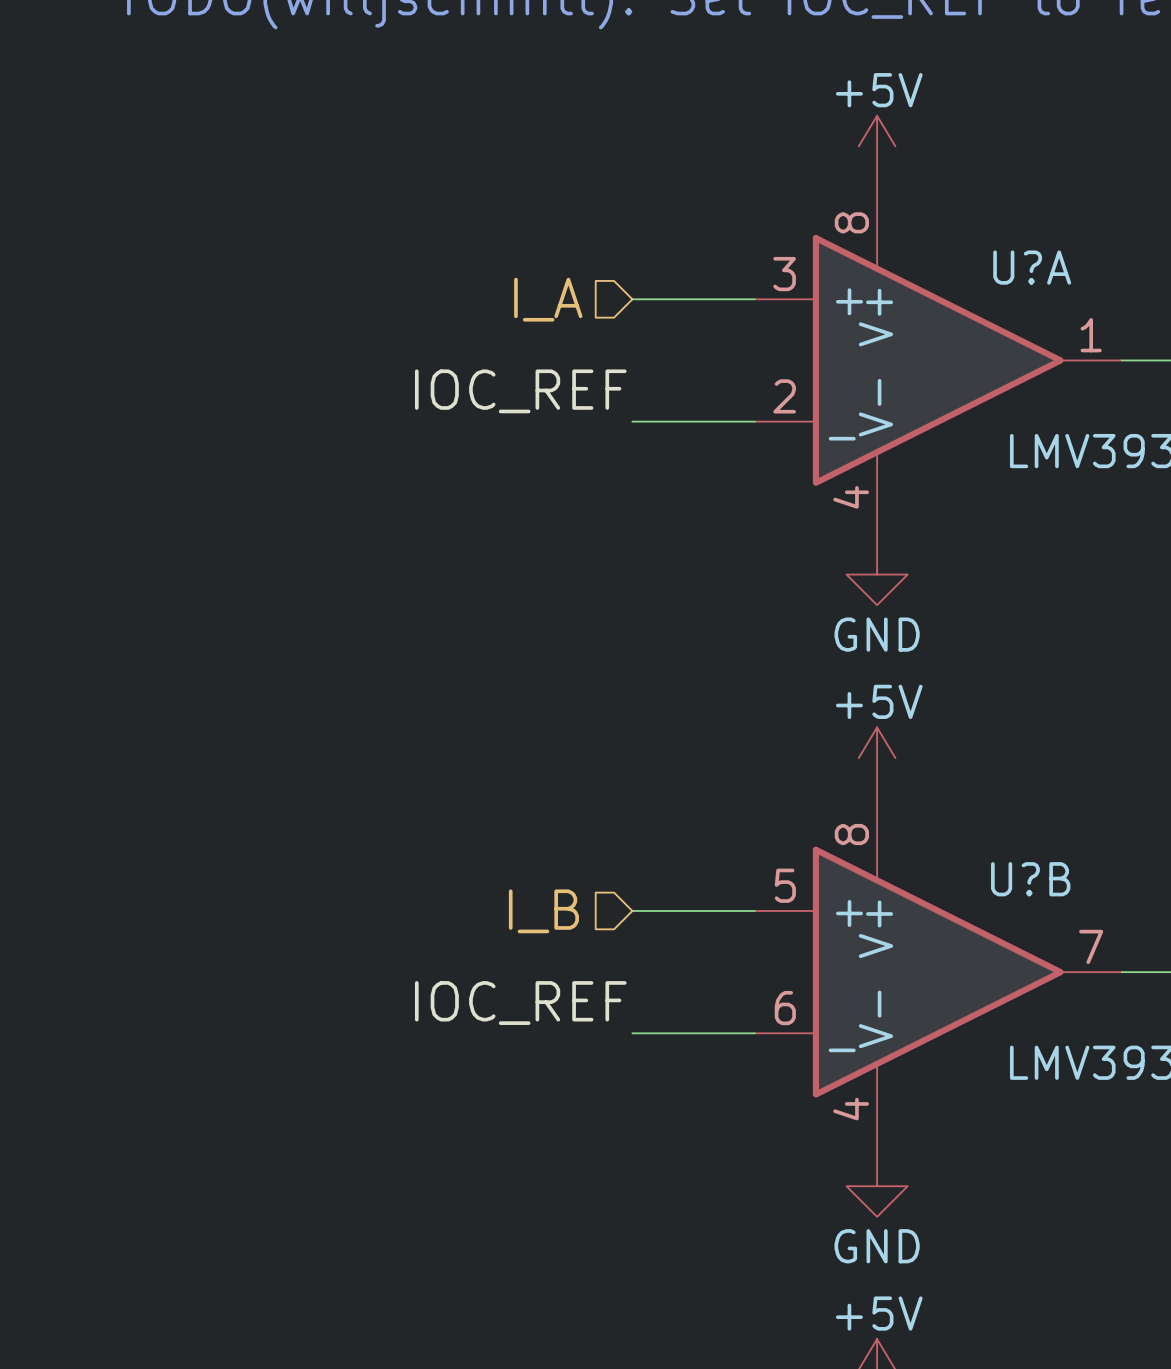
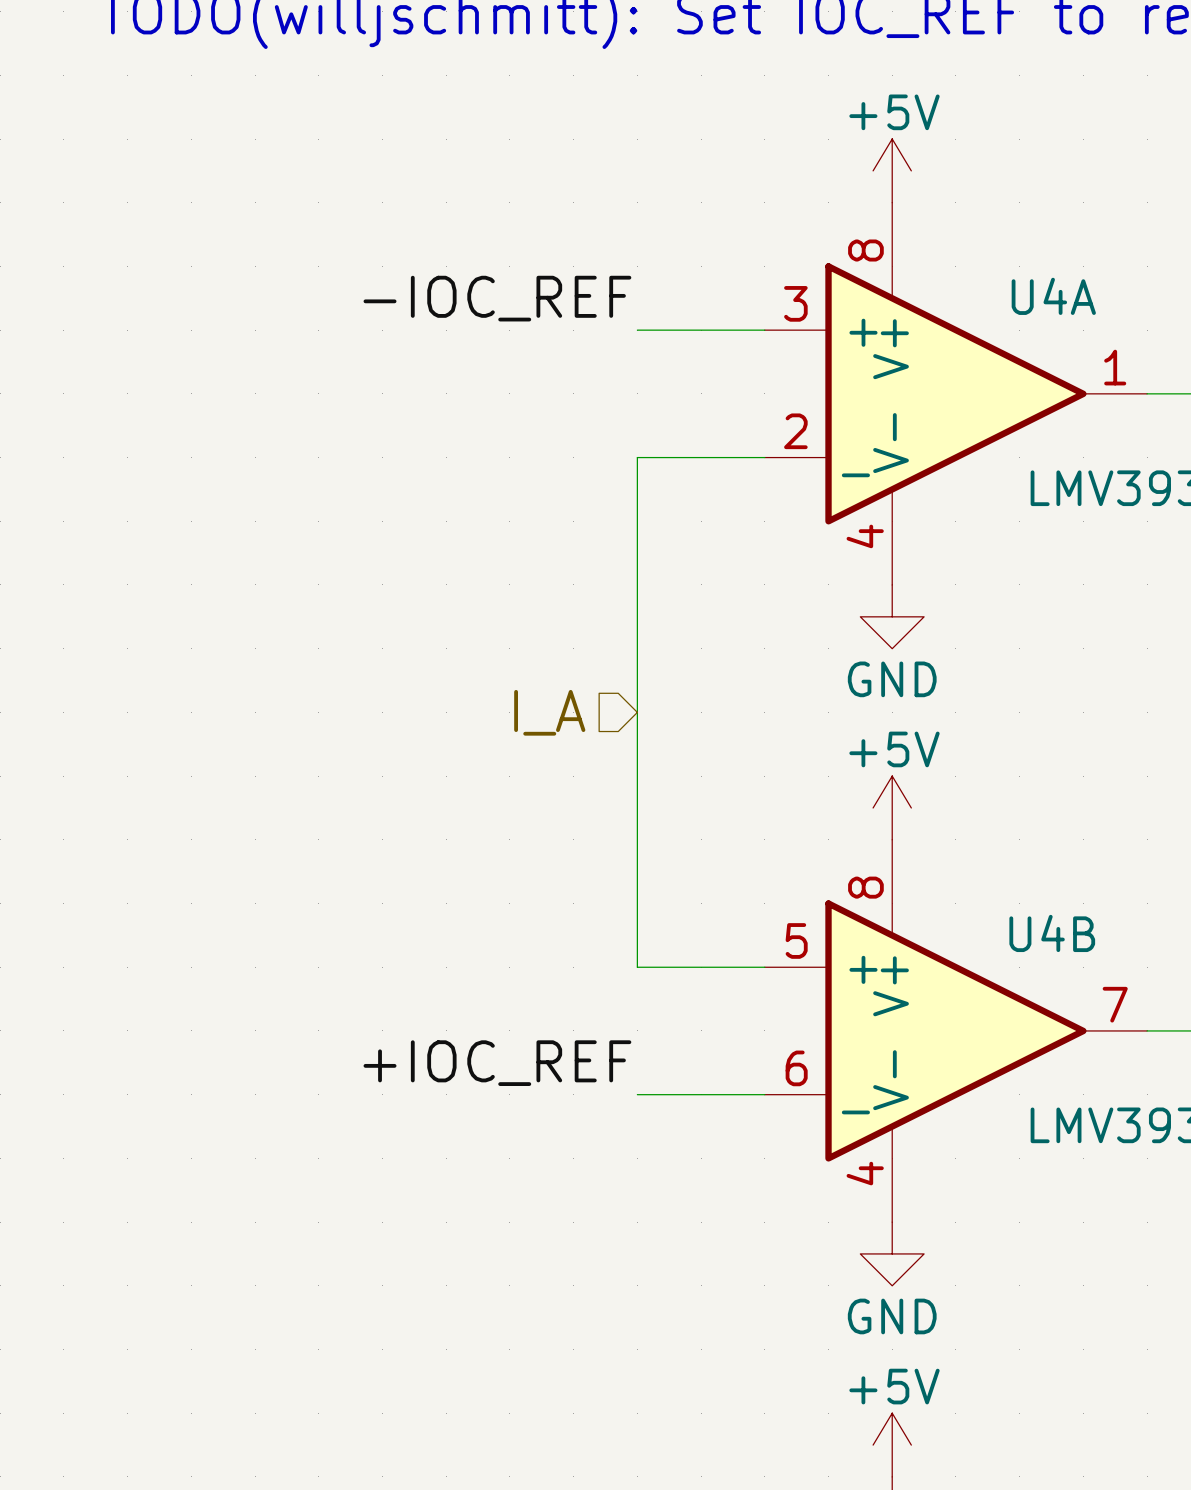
U?A name: U?A (1032, 267) -> U4A (1053, 296)
label: none -> -IOC_REF (497, 298)
hierarchical label position: I_A (548, 299) -> I_A (549, 712)
label: IOC_REF (520, 391) -> none
wire: none -> (637, 457) (637, 967)
U?B name: U?B (1030, 879) -> U4B (1052, 933)
hierarchical label: I_B (543, 911) -> none
label: IOC_REF (520, 1003) -> +IOC_REF (497, 1063)

